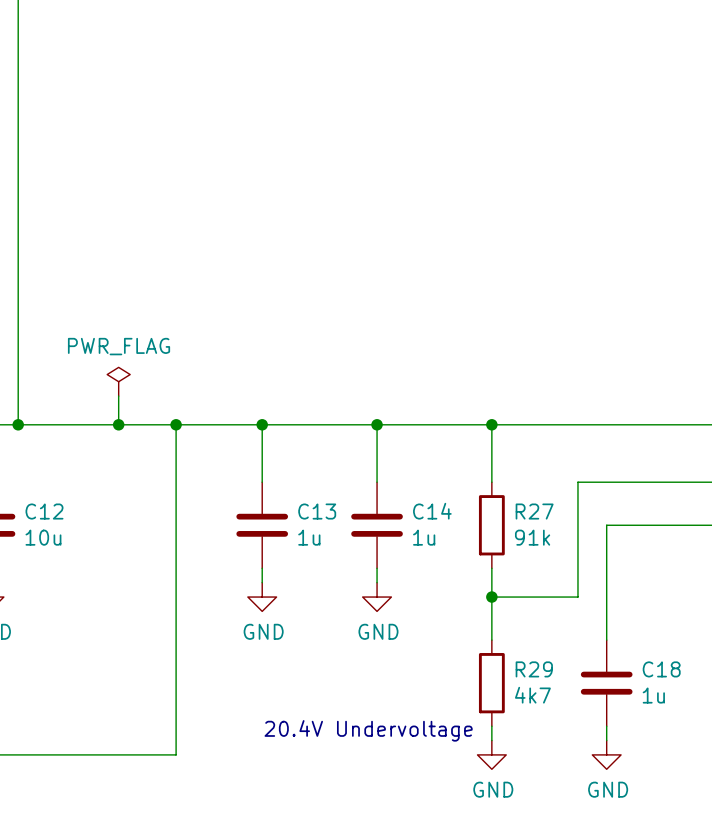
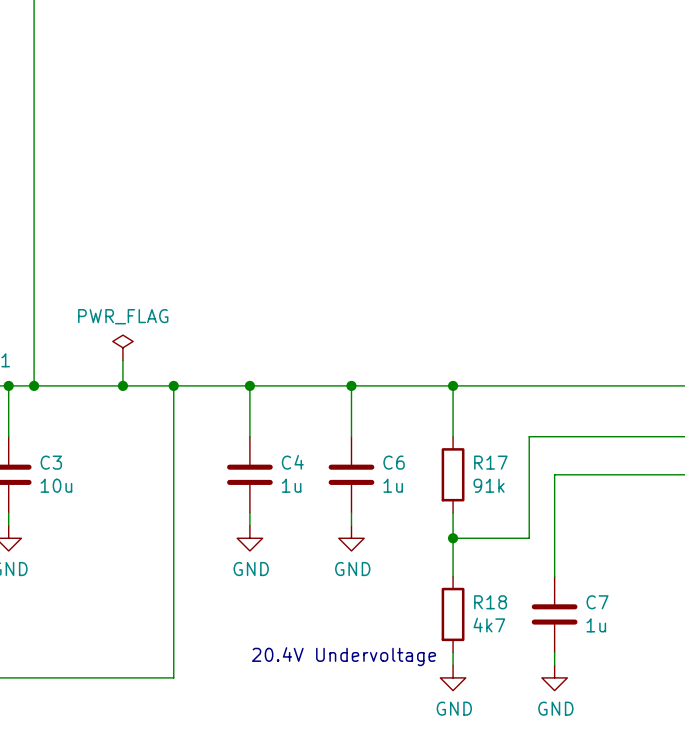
C12 name: C12 (44, 511) -> C3 (51, 462)
C13 name: C13 (317, 511) -> C4 (292, 462)
C14 name: C14 (432, 511) -> C6 (394, 462)
R27 name: R27 (534, 511) -> R17 (490, 462)
R29 name: R29 (534, 669) -> R18 (490, 602)
C18 name: C18 (661, 669) -> C7 (597, 602)

